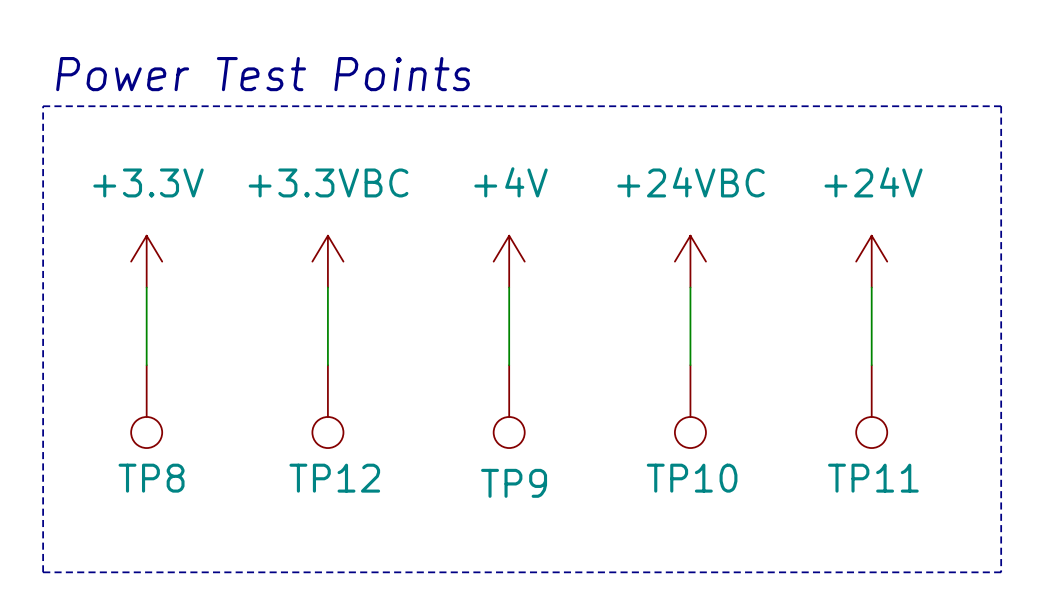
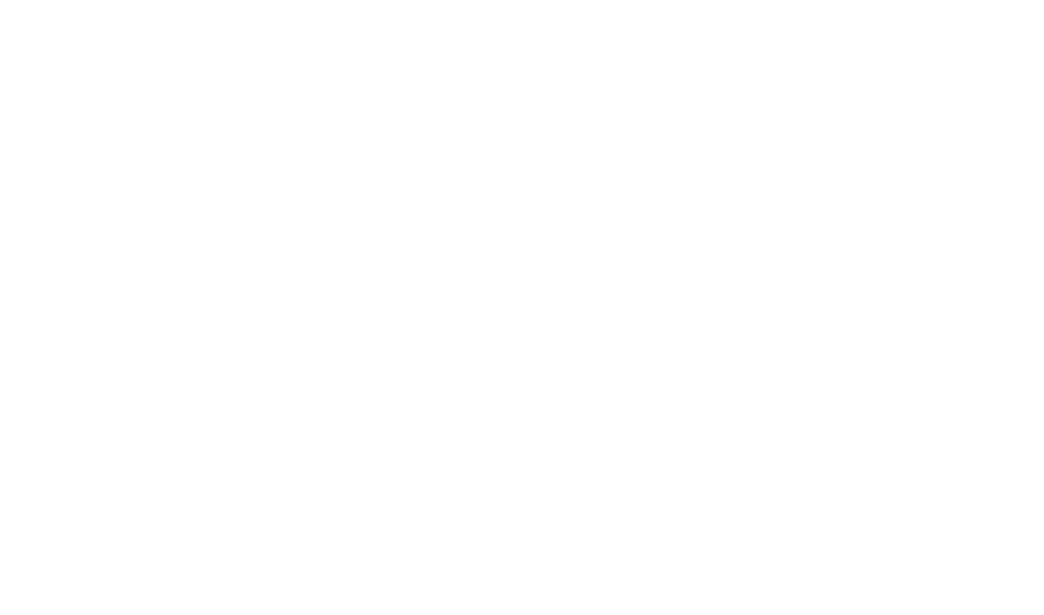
text: Power Test Points (263, 74) -> none
line: (43, 106) (1001, 106) (1001, 572) (43, 572) (43, 106) -> none
power symbol: +3.3V (146, 261) -> none
power symbol: +3.3VBC (327, 261) -> none
power symbol: +4V (509, 261) -> none
power symbol: +24VBC (690, 261) -> none
power symbol: +24V (871, 261) -> none
wire: (146, 287) (146, 365) -> none
wire: (327, 287) (327, 365) -> none
wire: (509, 287) (509, 365) -> none
wire: (690, 287) (690, 365) -> none
wire: (871, 287) (871, 365) -> none
TP8: (146, 406) -> none
TP12: (327, 406) -> none
TP9: (509, 406) -> none
TP10: (690, 406) -> none
TP11: (871, 406) -> none

